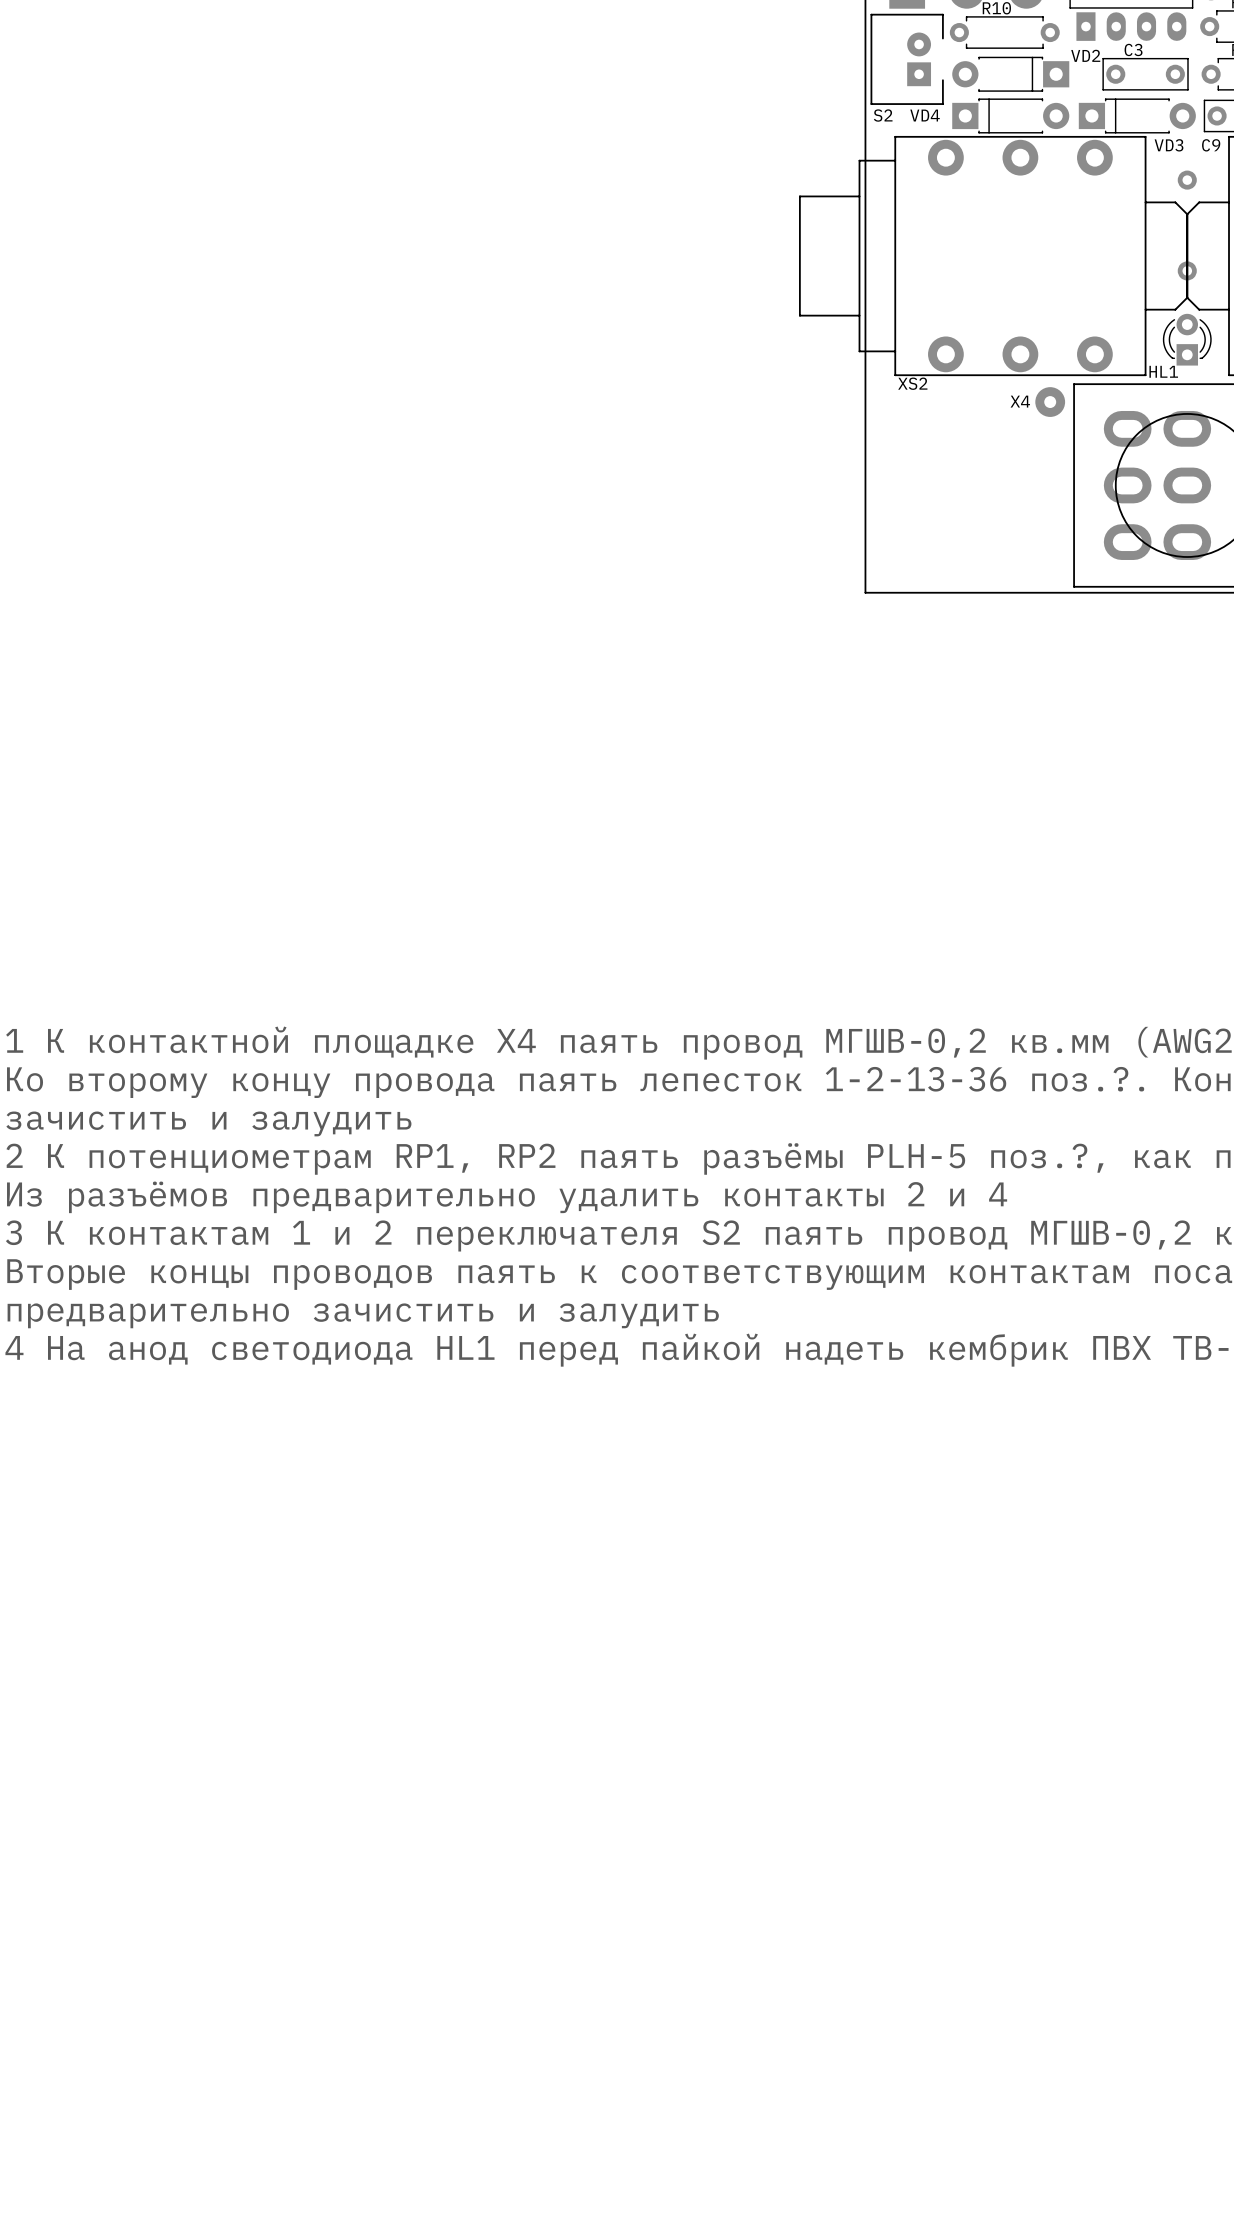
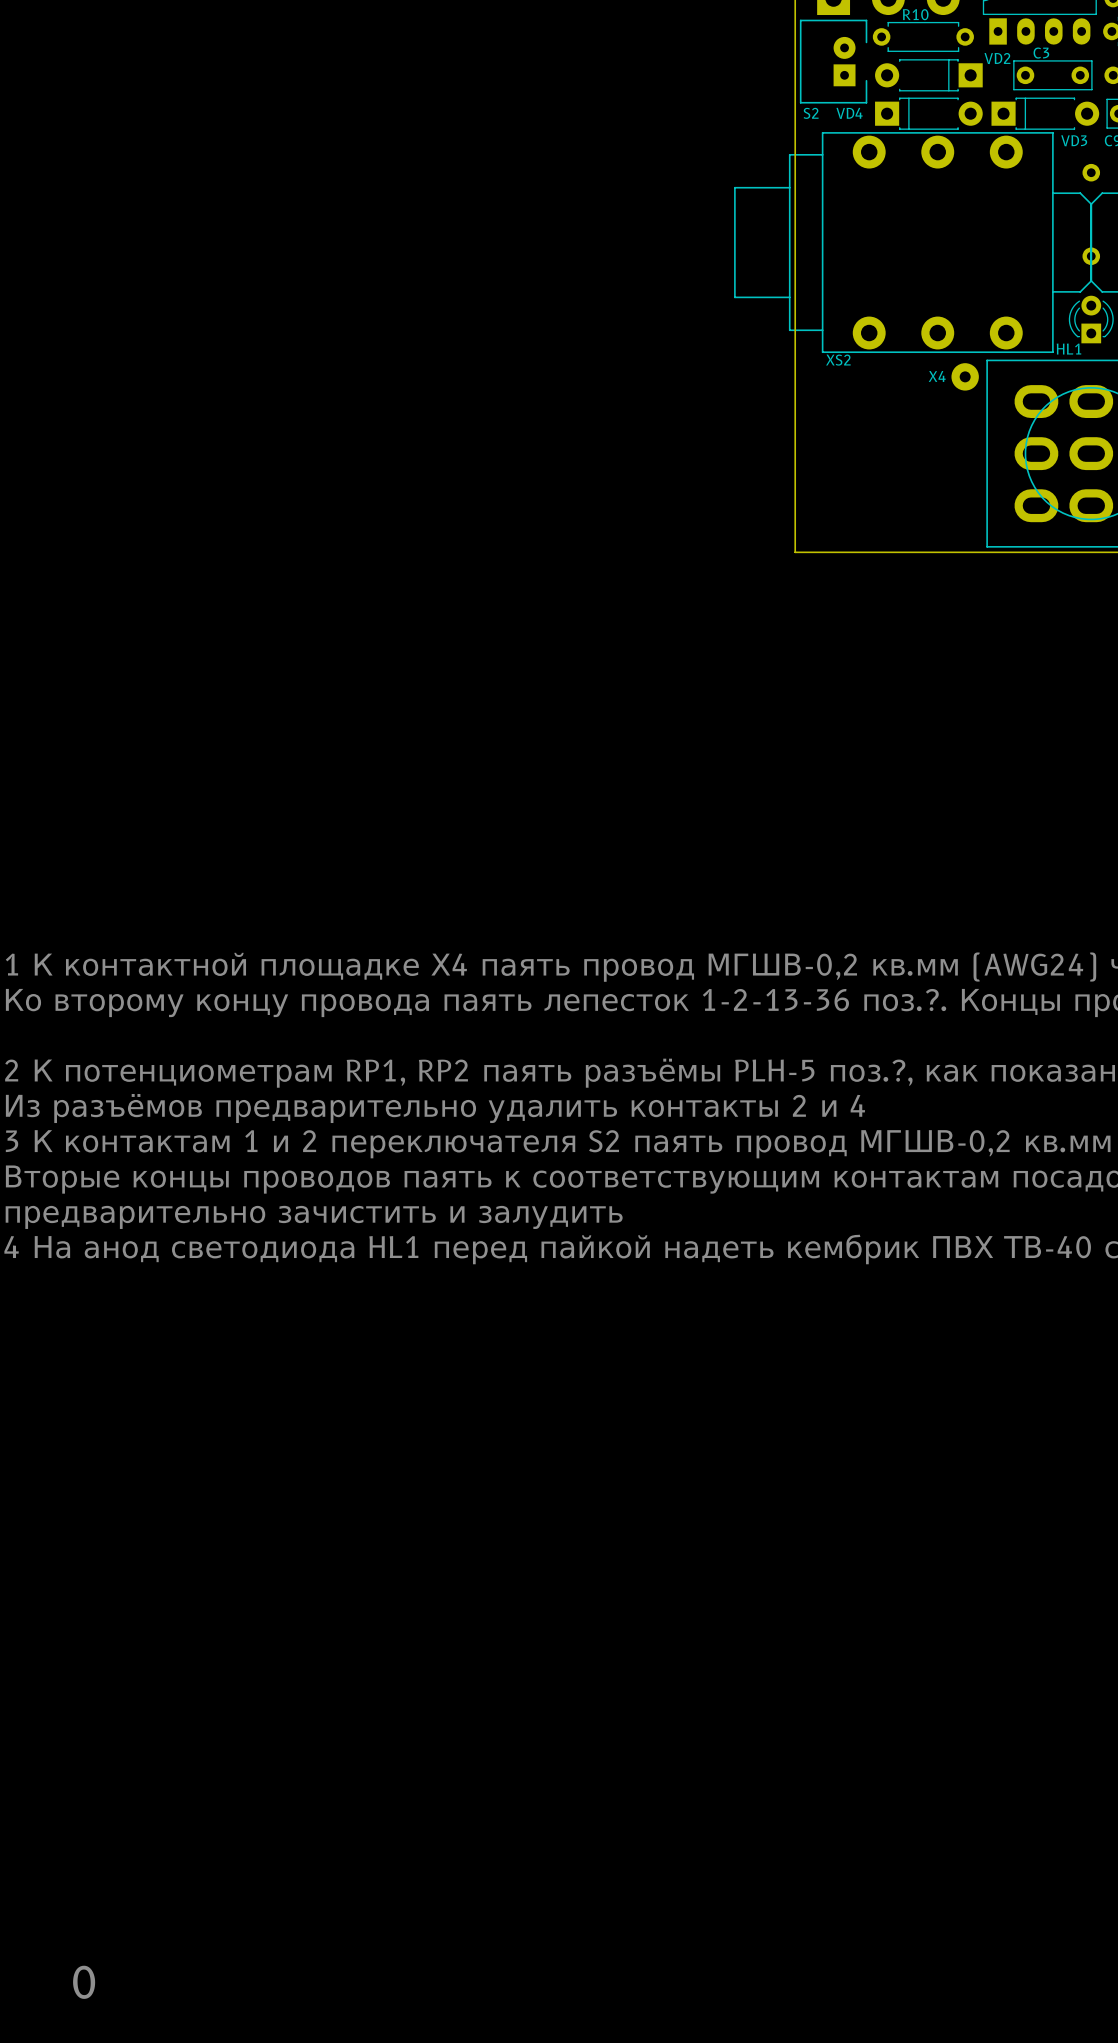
text: зачистить и залудить (208, 1123) -> none
text: none -> 0 (84, 1982)

